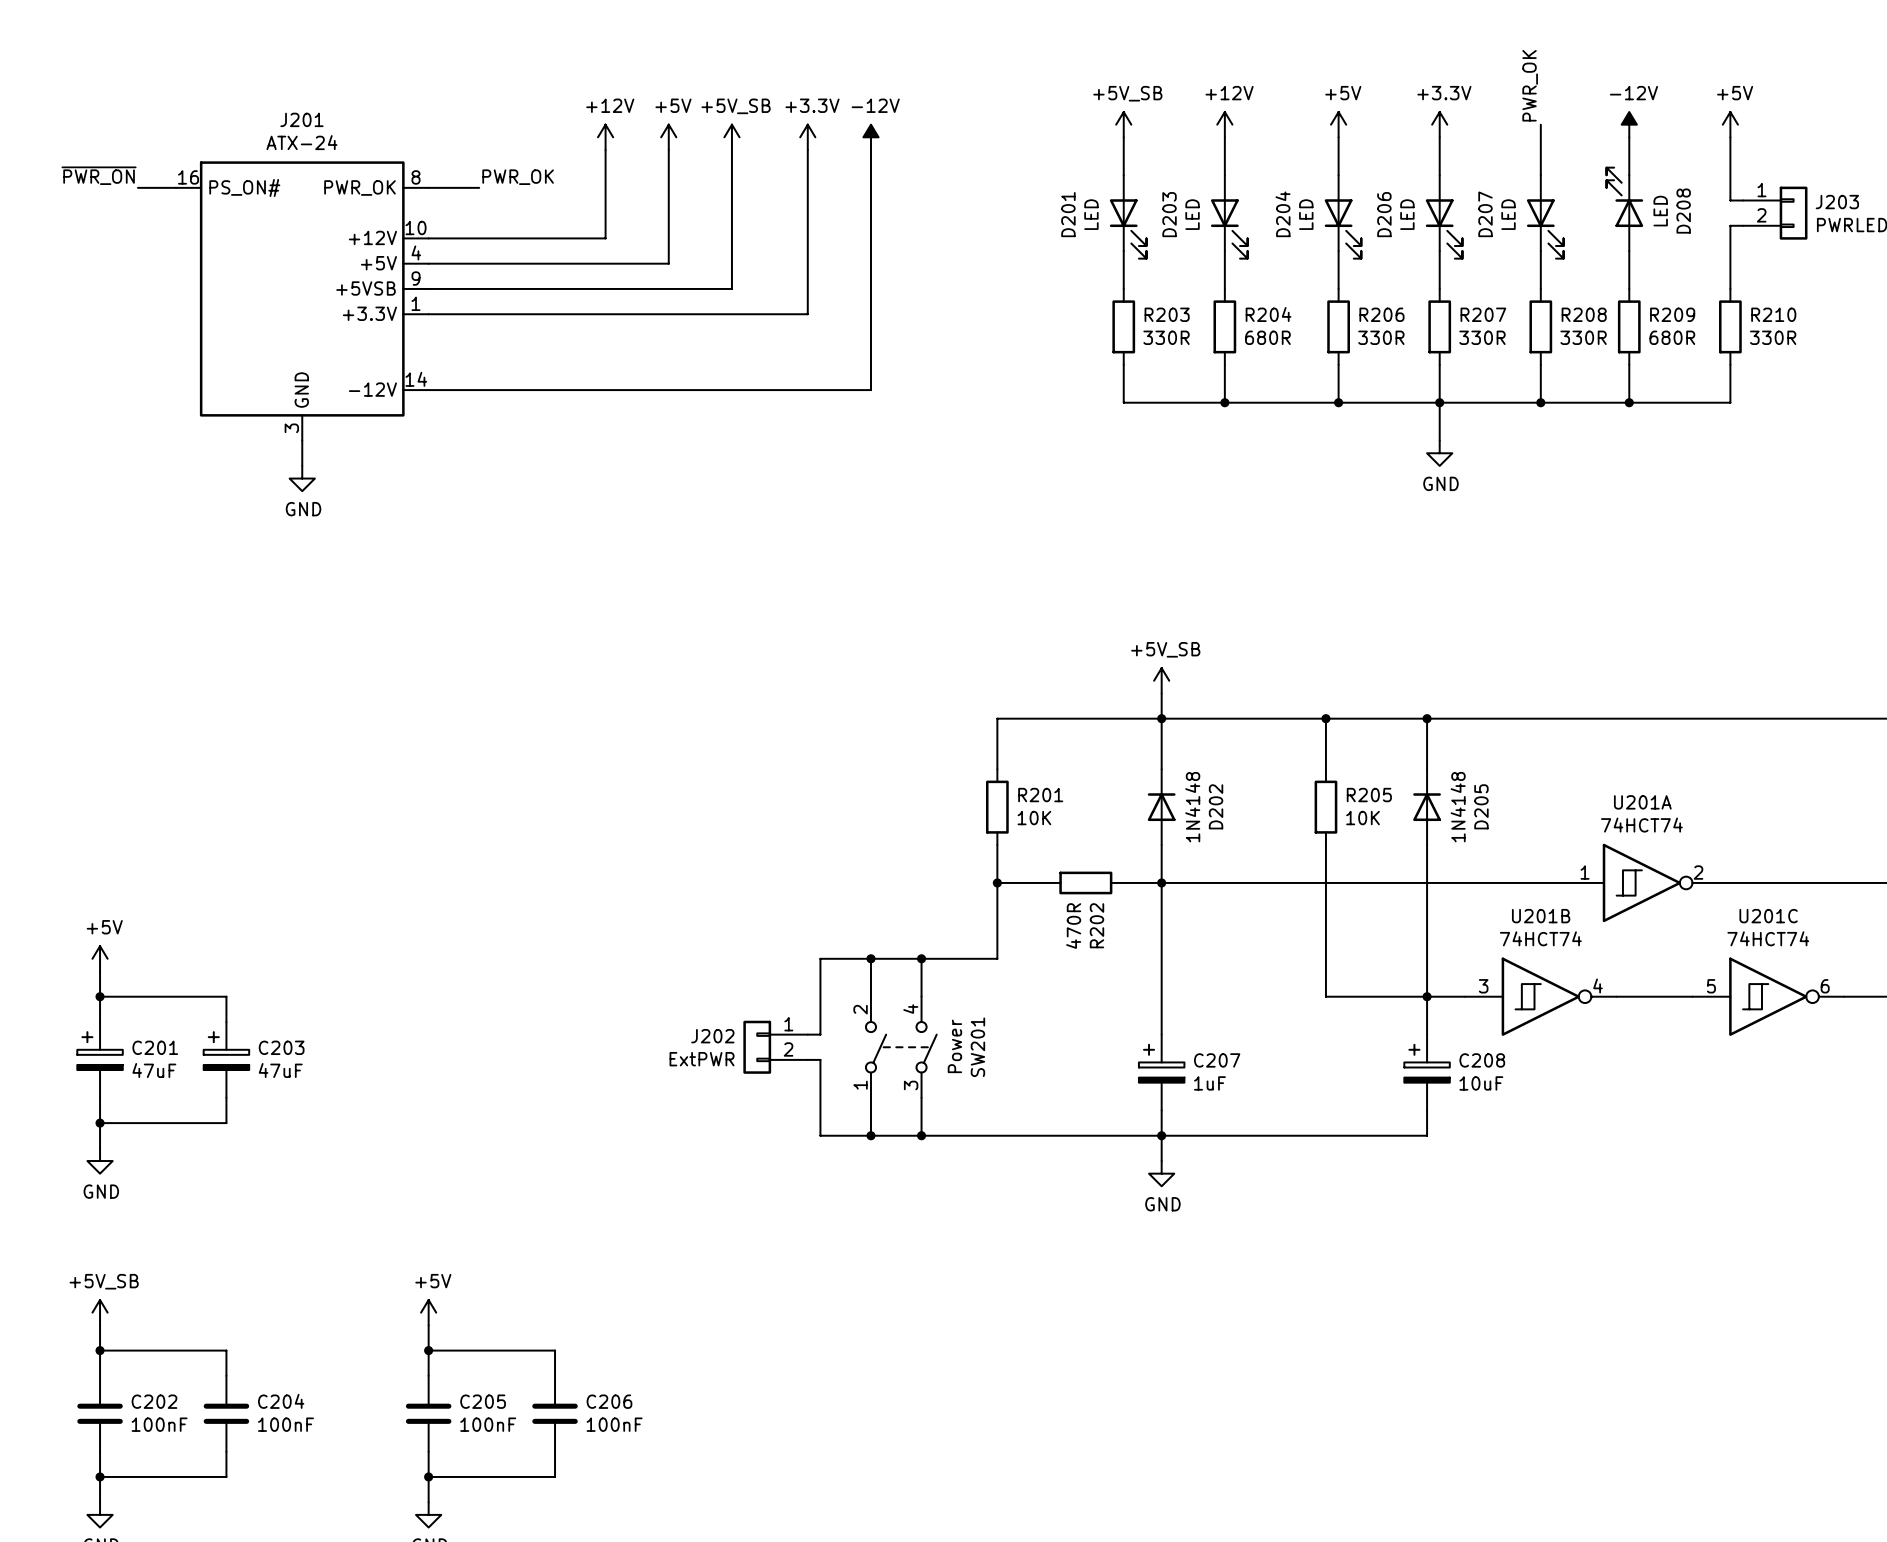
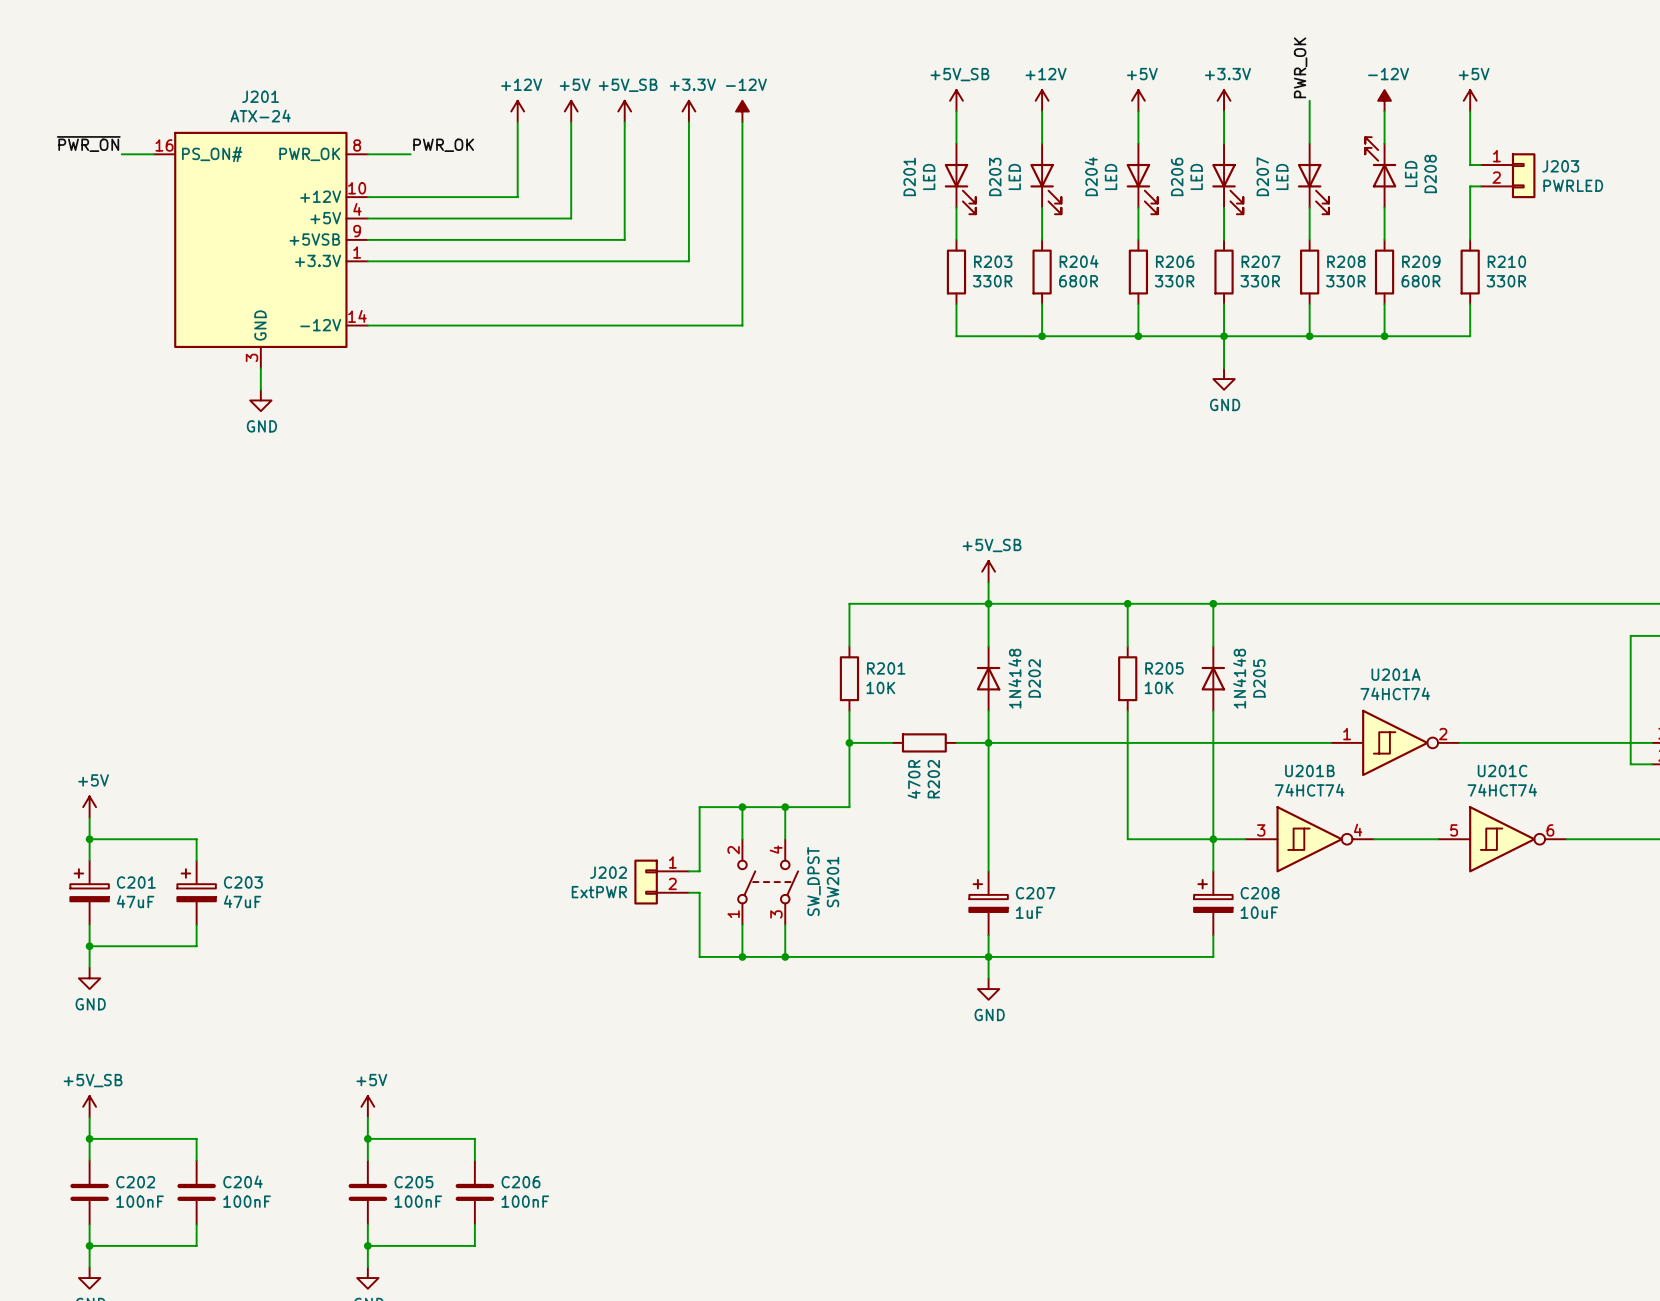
SW201 value: Power (954, 1046) -> SW_DPST (814, 881)

